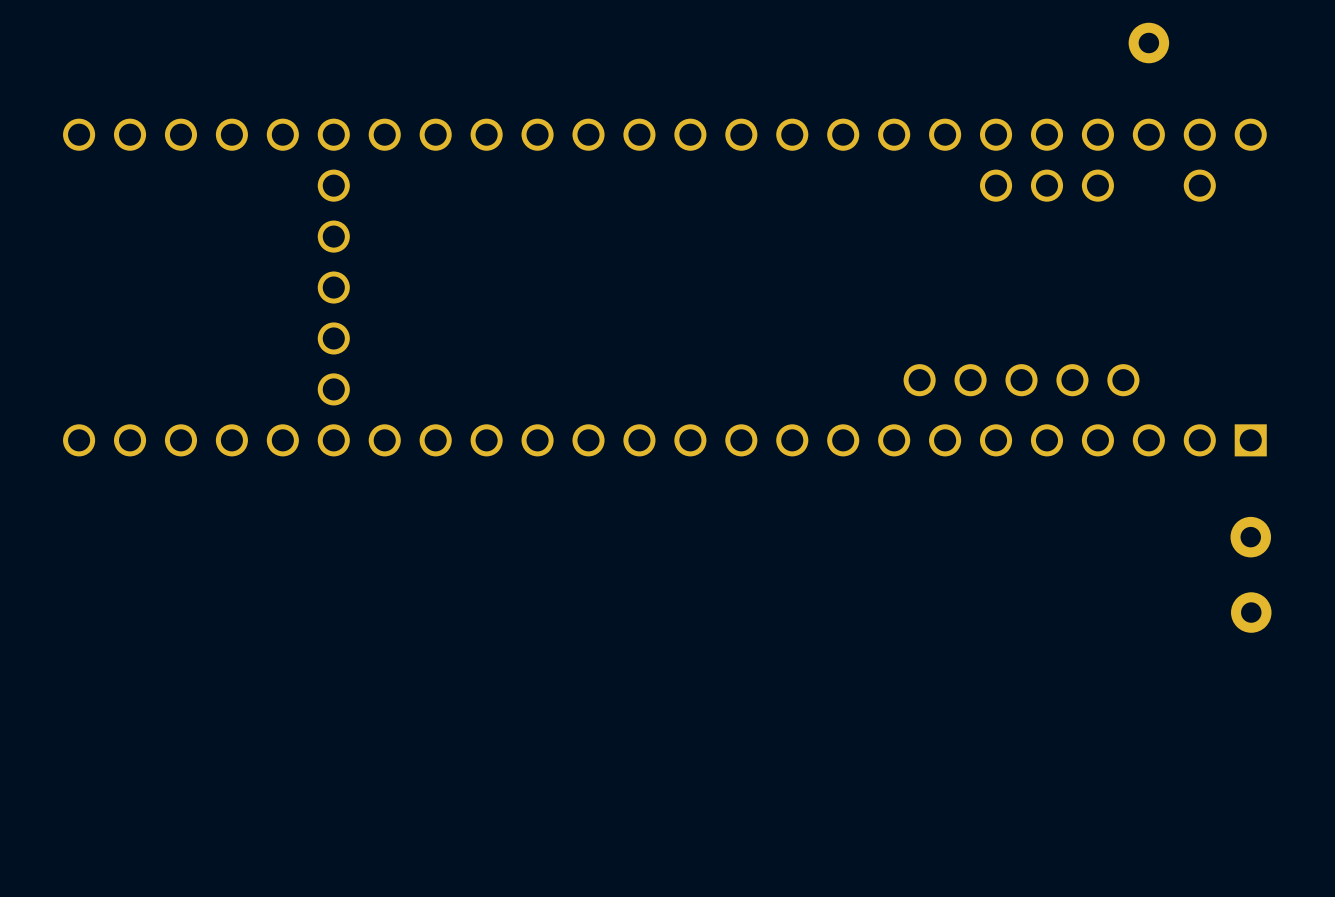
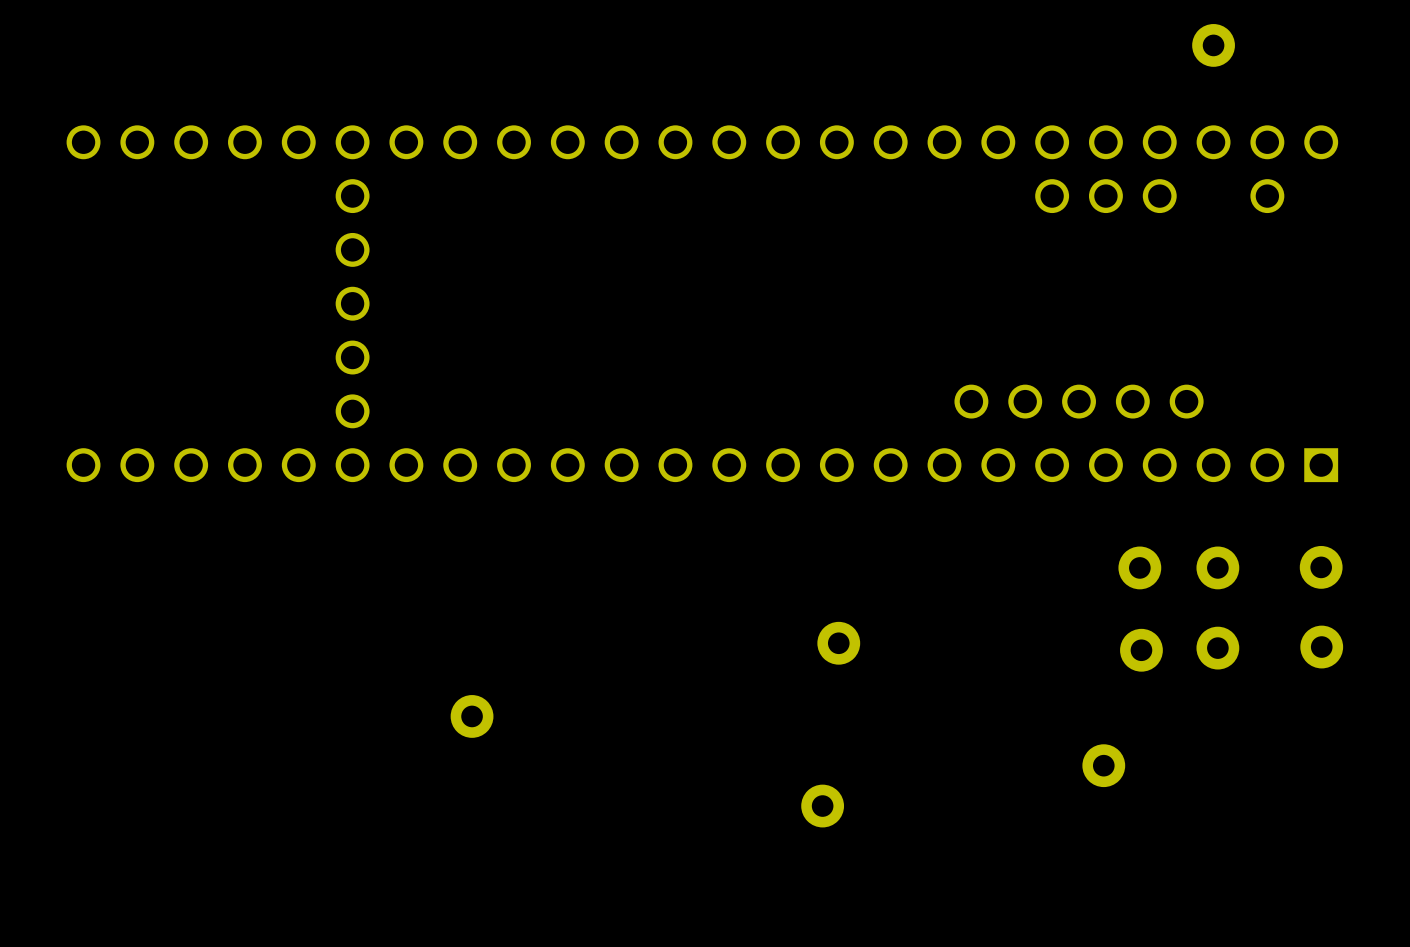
part: none -> (1139, 567)
part: none -> (1217, 567)
part: none -> (838, 643)
part: none -> (1217, 648)
part: none -> (1141, 650)
part: none -> (472, 716)
part: none -> (1103, 765)
part: none -> (822, 806)

